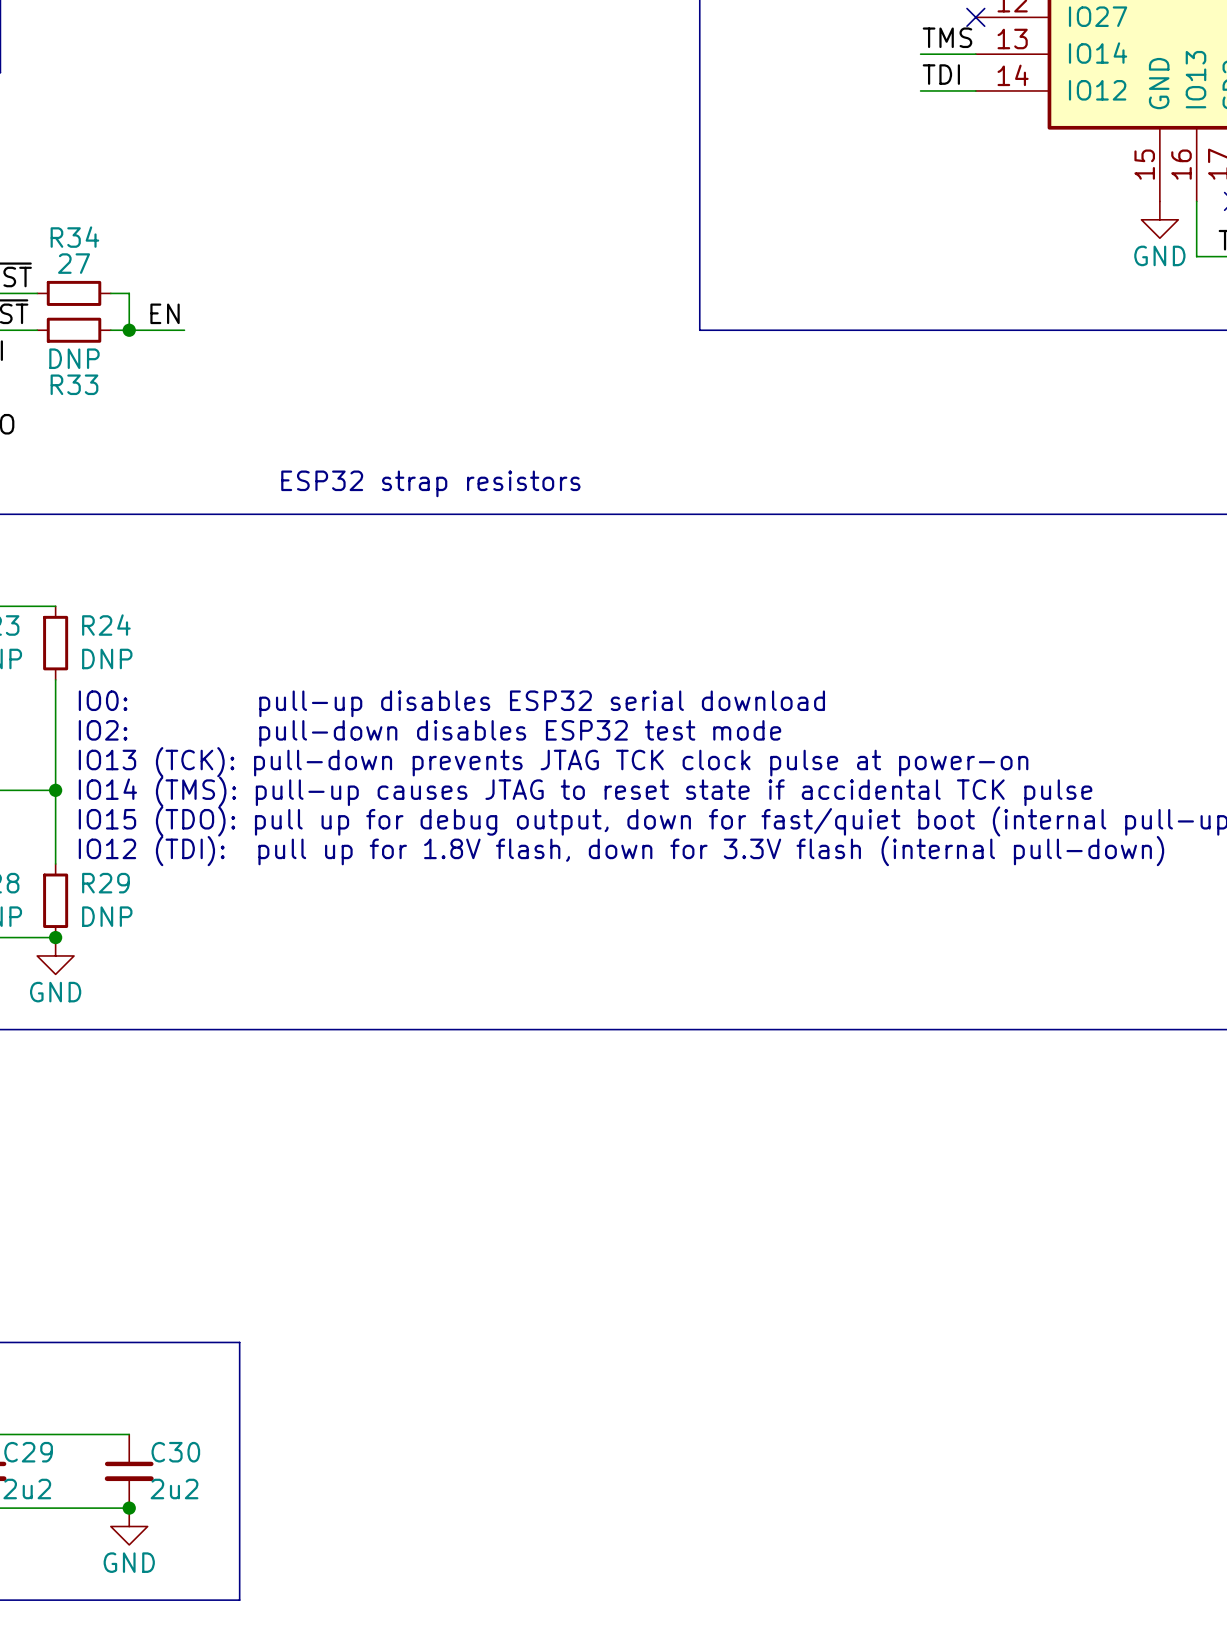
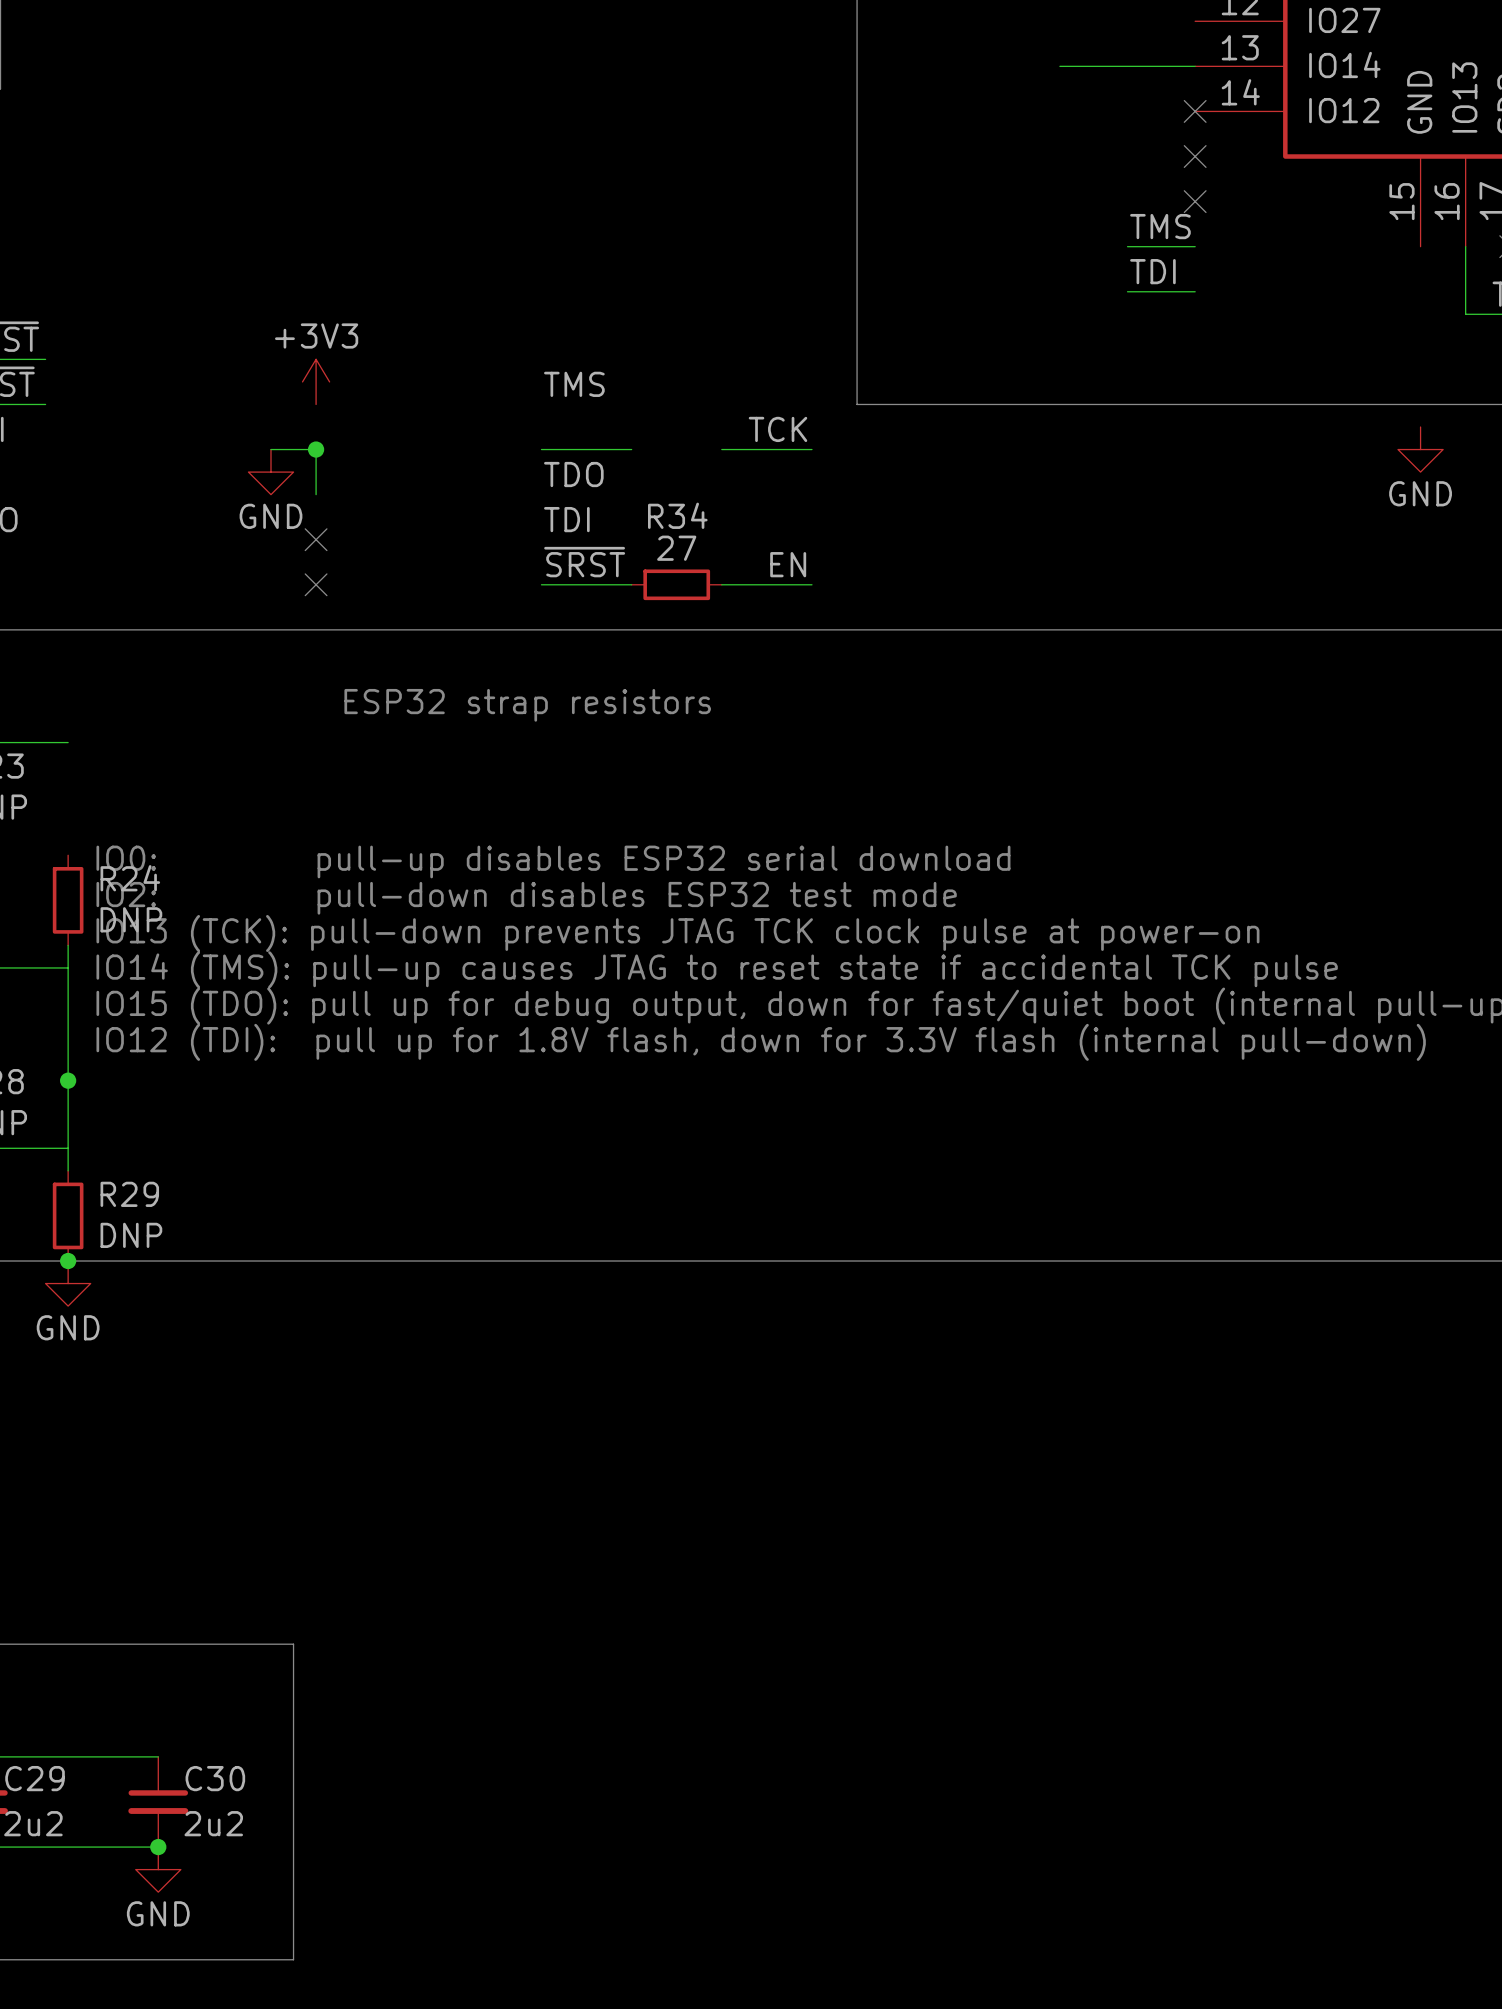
no-connect mark: (975, 17) -> none
label position: TMS (947, 37) -> TMS (1160, 226)
wire: none -> (1059, 66) (1127, 66)
label position: TDI (941, 74) -> TDI (1152, 271)
wire: (920, 90) (975, 90) -> (1127, 291) (1195, 291)
no-connect mark: none -> (1195, 111)
no-connect mark: none -> (1195, 156)
no-connect mark: none -> (1195, 201)
wire: none -> (1127, 246) (1195, 246)
power symbol position: GND (1159, 219) -> GND (1420, 449)
R34 position: (74, 293) -> (676, 584)
wire: (110, 293) (129, 293) (129, 330) -> none
power symbol: none -> +3V3 (316, 381)
label: EN (165, 313) -> none
label: none -> TMS (574, 384)
R33: DNP (74, 330) -> none
wire: (110, 330) (184, 330) -> (541, 449) (631, 449)
junction: (129, 330) -> none
label: none -> TCK (777, 429)
wire: none -> (270, 449) (316, 449) (316, 494)
junction: none -> (316, 449)
wire: none -> (721, 449) (811, 449)
power symbol: none -> GND (270, 472)
label: none -> TDO (573, 474)
label: none -> TDI (566, 519)
no-connect mark: none -> (316, 539)
label: none -> ~{SRST} (584, 562)
label: none -> EN (788, 564)
no-connect mark: none -> (316, 584)
wire: none -> (541, 584) (631, 584)
wire: none -> (721, 584) (811, 584)
text position: ESP32 strap resistors (430, 483) -> ESP32 strap resistors (527, 705)
R24 position: (55, 643) -> (68, 900)
wire: (55, 679) (55, 771) -> (68, 1058) (68, 1170)
junction: (55, 790) -> none
junction: none -> (68, 1080)
R29 position: (55, 900) -> (68, 1215)
junction: (55, 937) -> none
power symbol position: GND (55, 955) -> GND (68, 1283)
junction: none -> (68, 1261)

